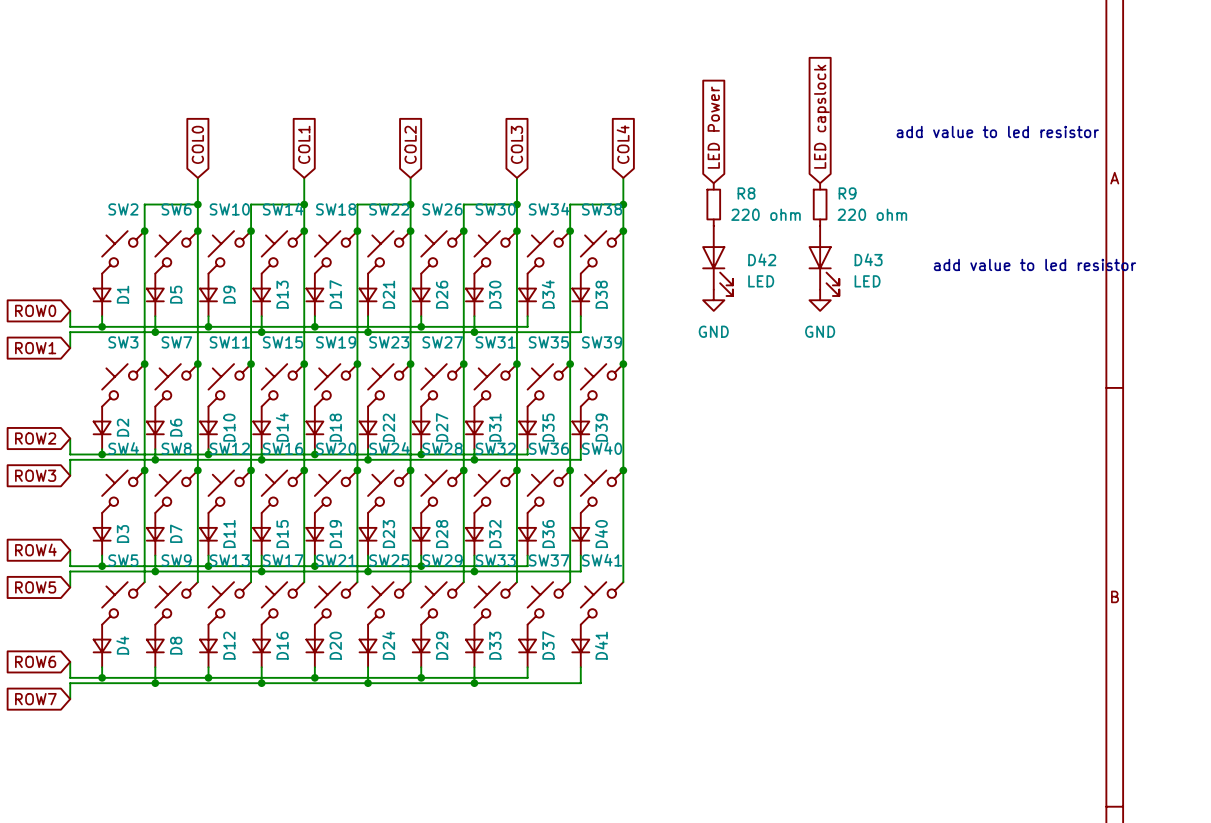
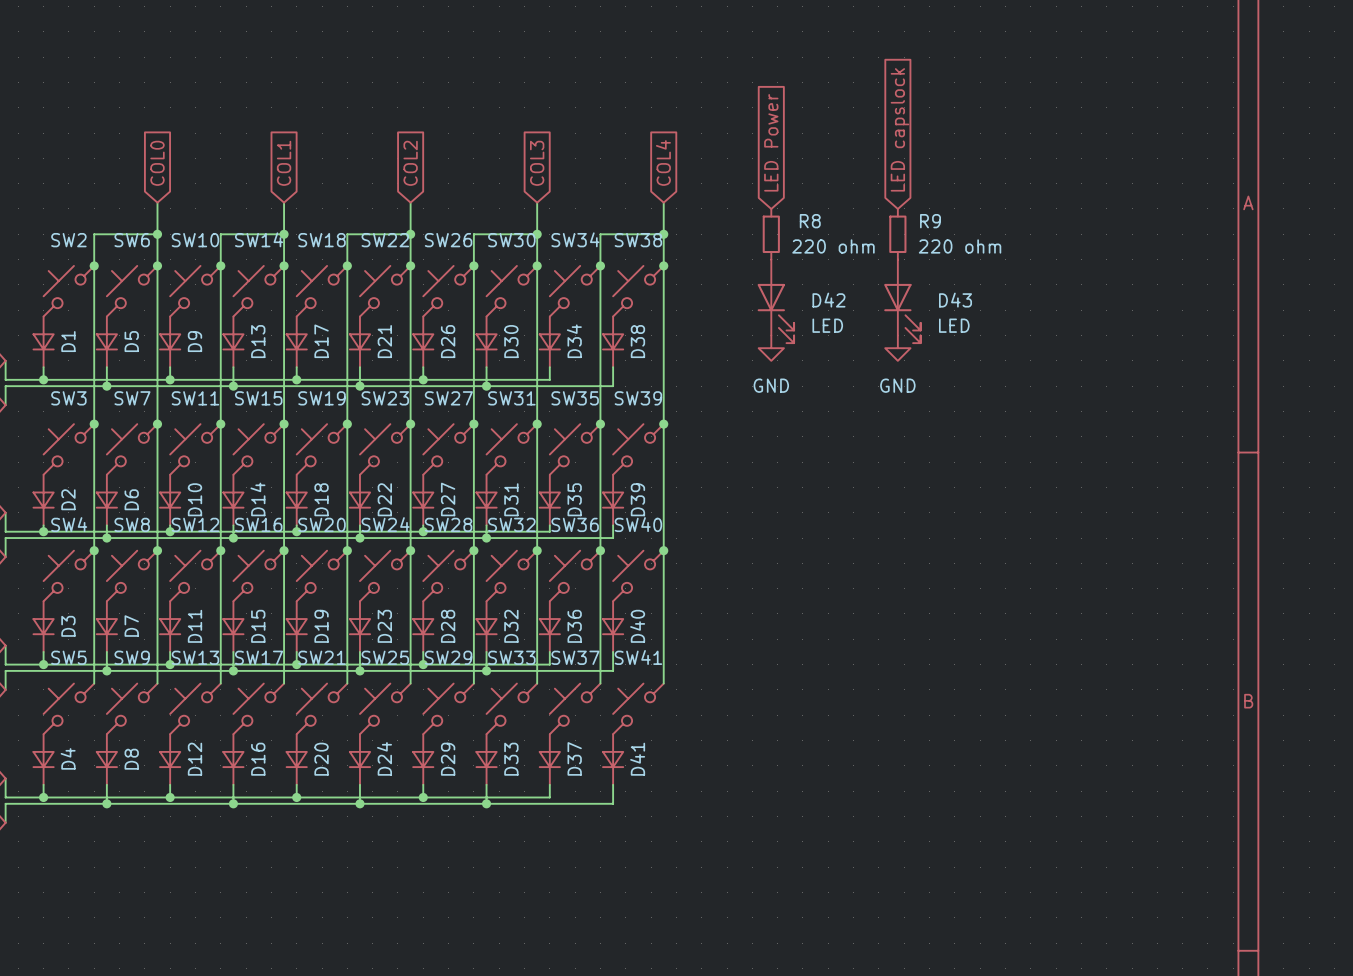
text: add value to led resistor (997, 131) -> none
text: add value to led resistor (1034, 264) -> none

